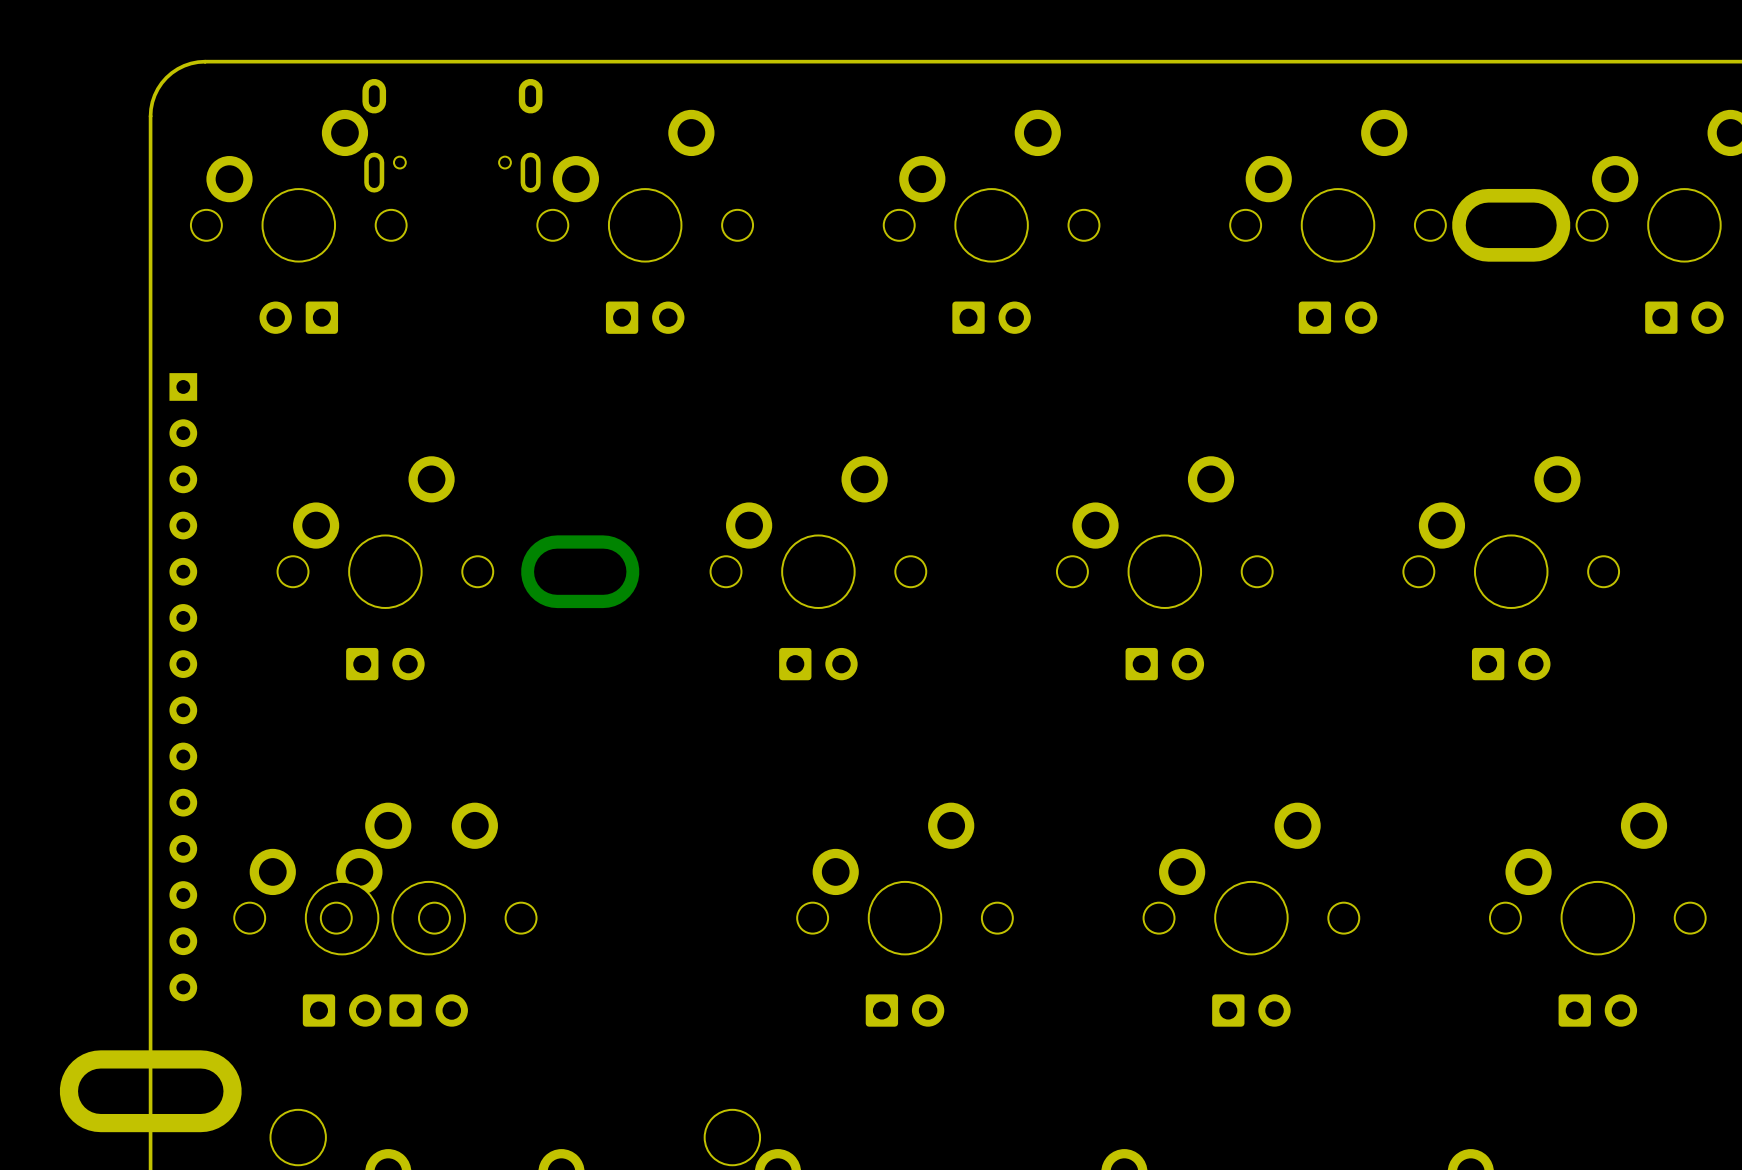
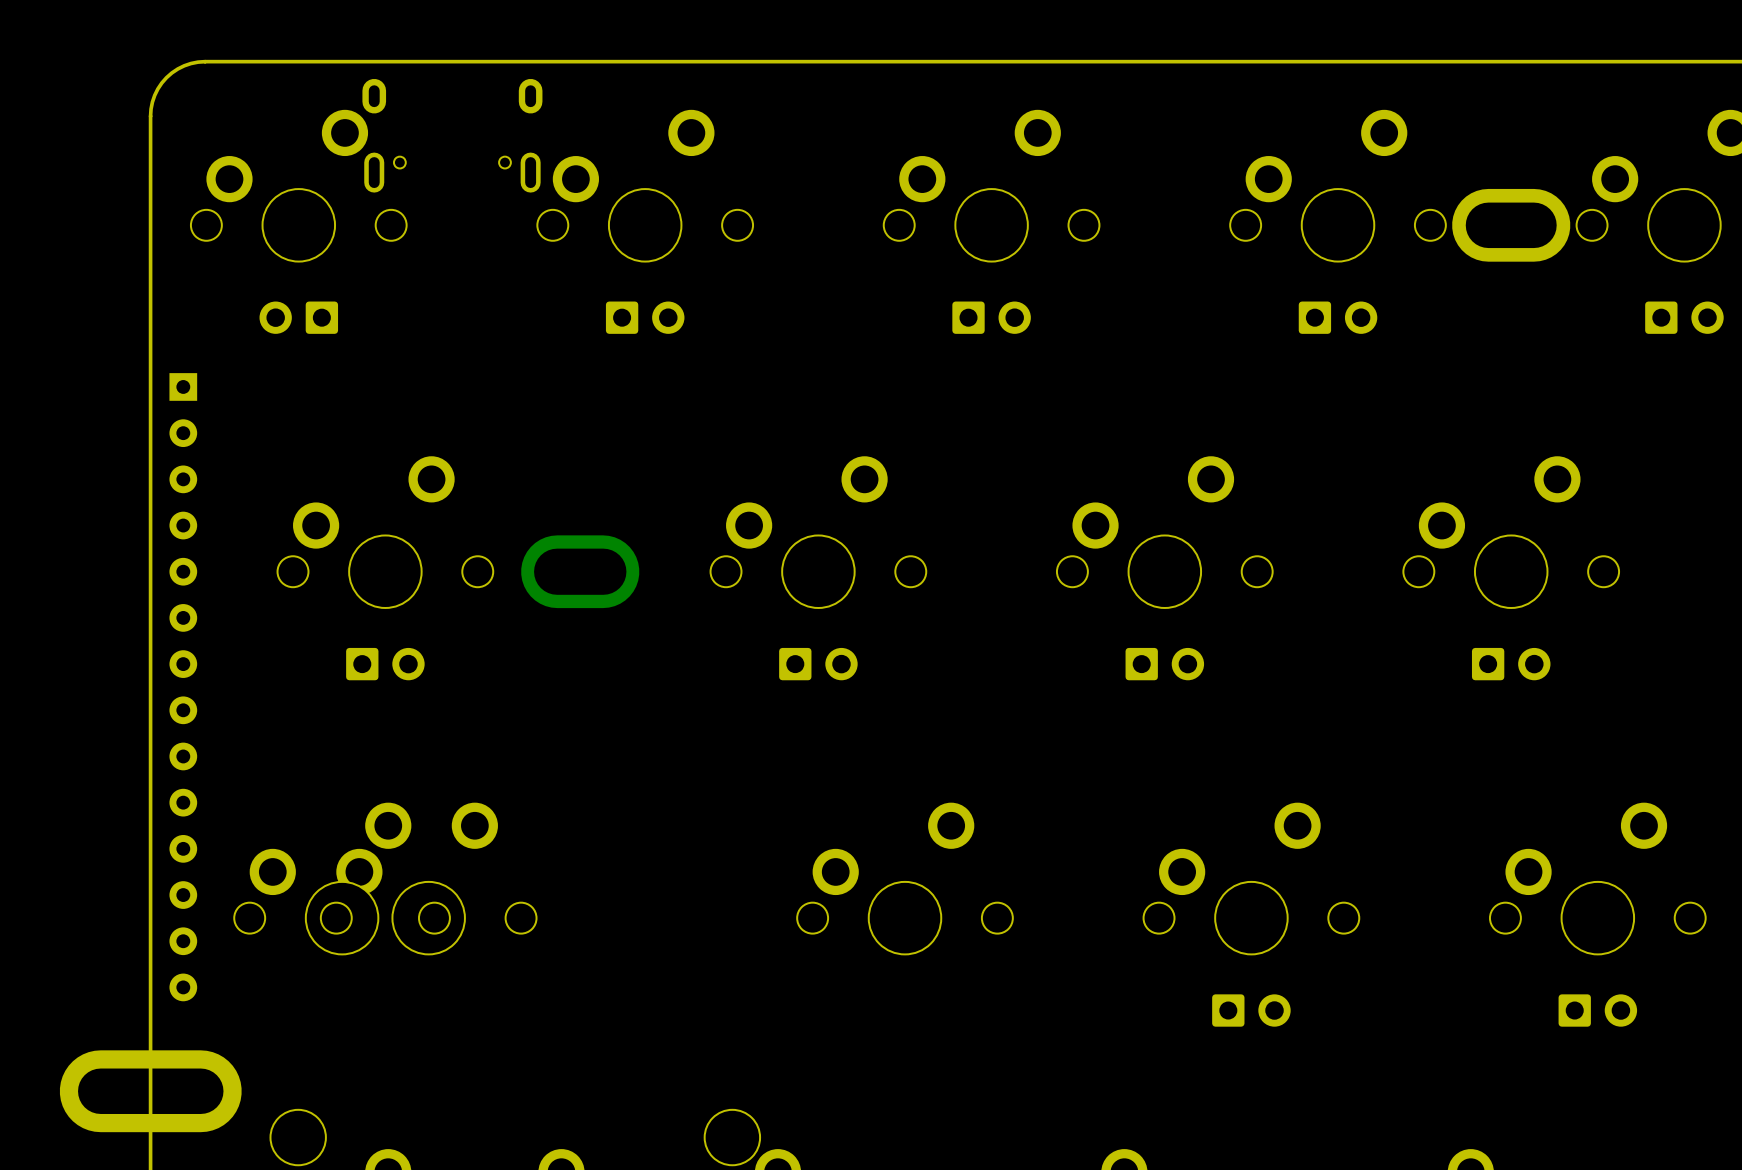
part: (342, 1010) -> none
part: (428, 1010) -> none
part: (905, 1010) -> none

